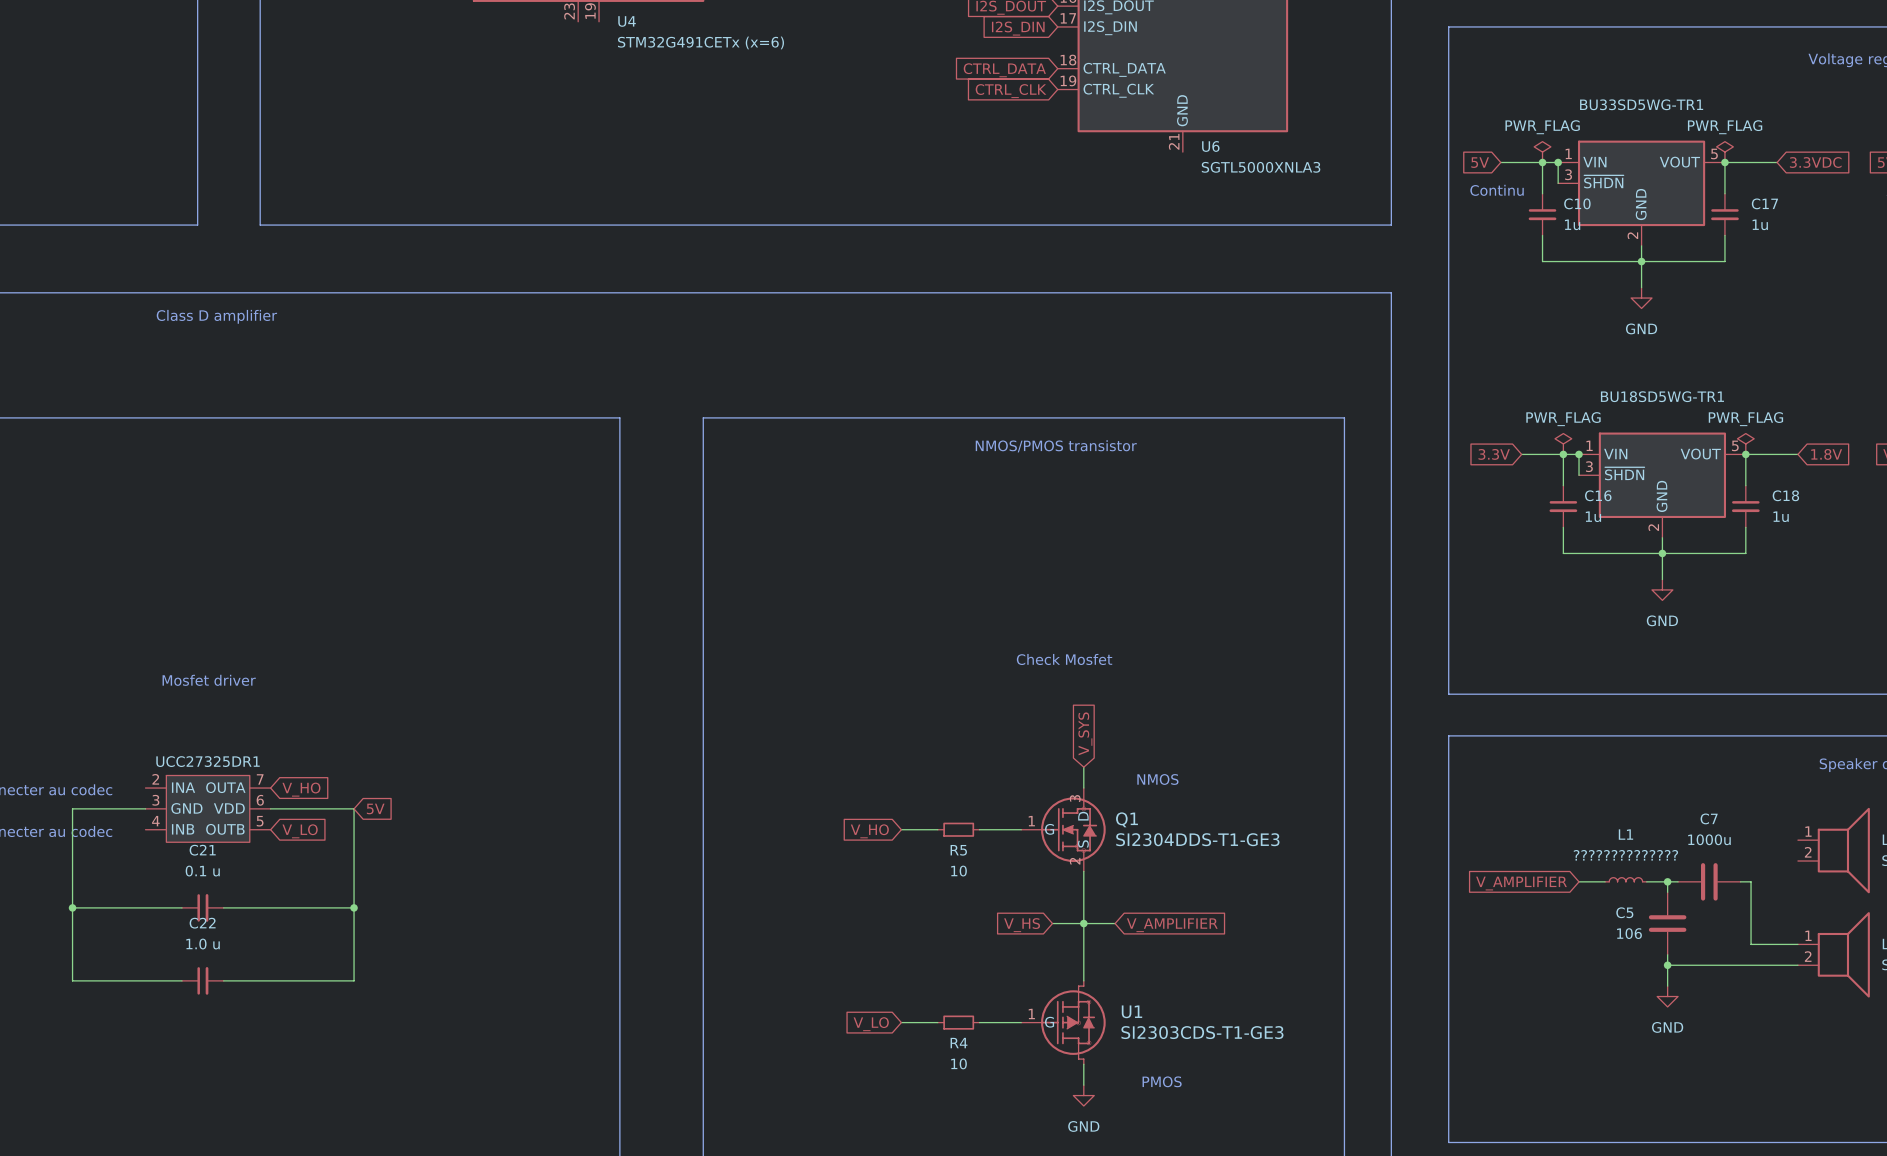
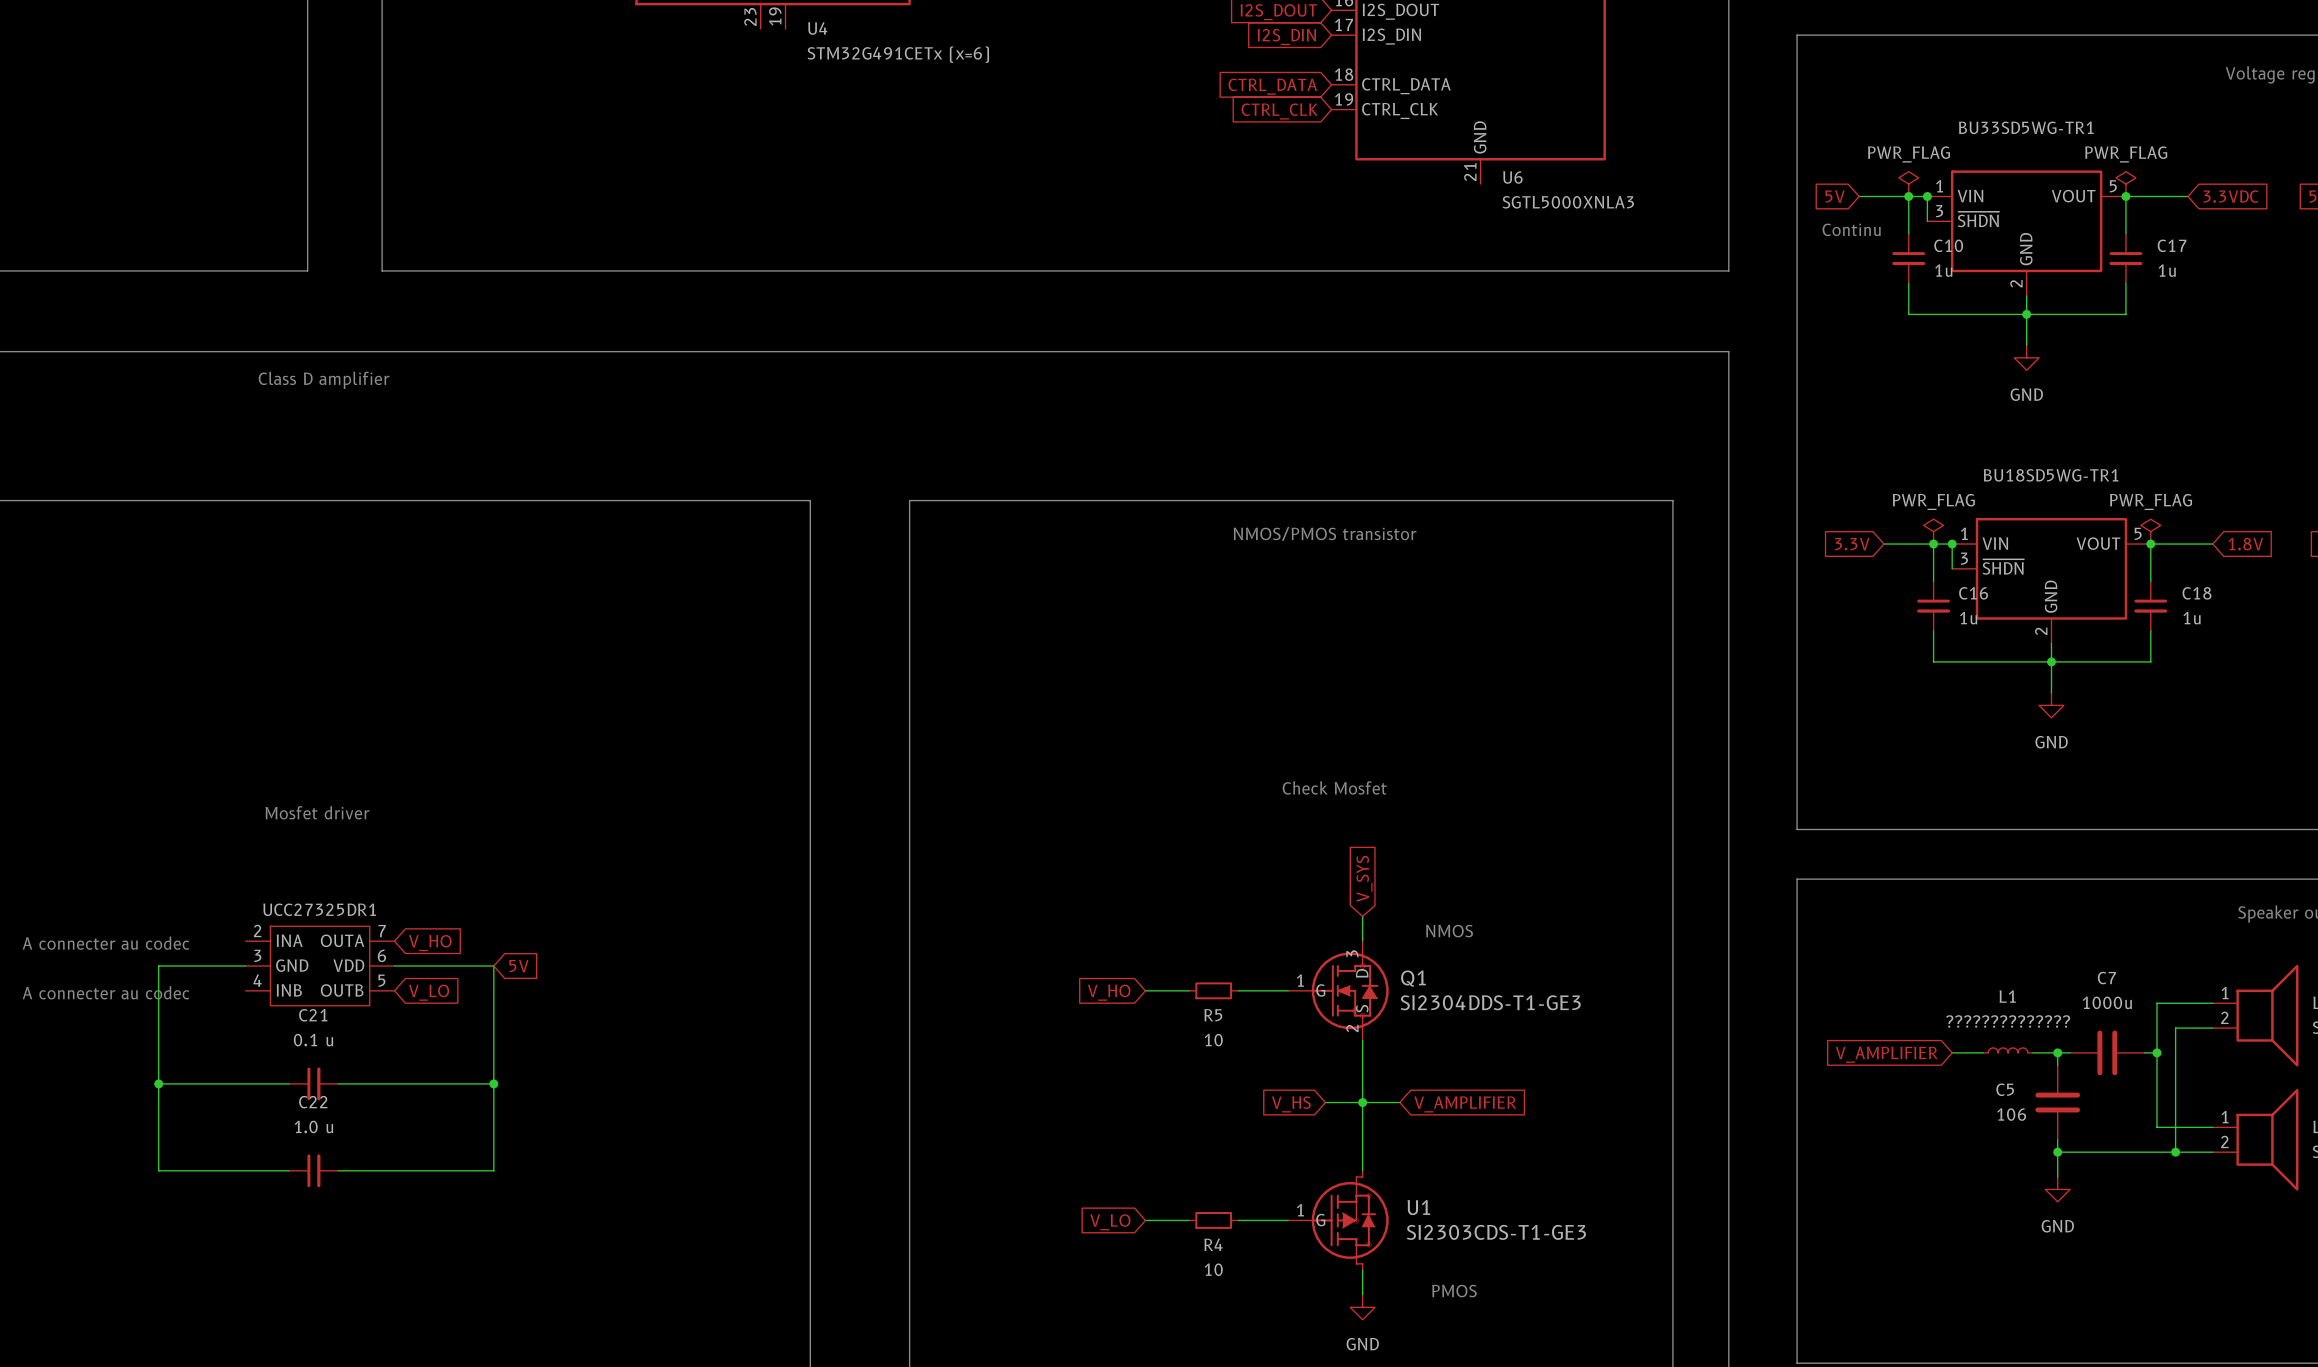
wire: none -> (2212, 1003) (2156, 1003) (2156, 1052)
wire: none -> (2212, 1028) (2175, 1028) (2175, 1152)
junction: none -> (2156, 1052)
junction: none -> (2175, 1152)

